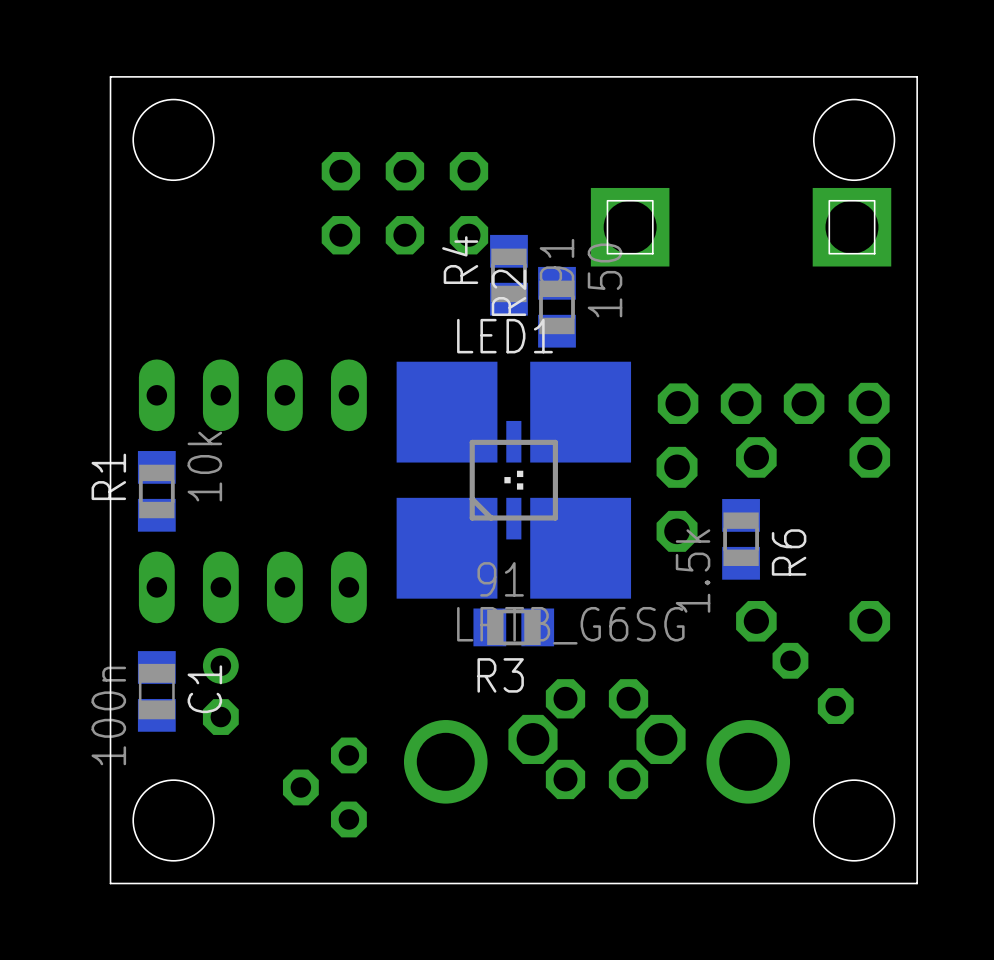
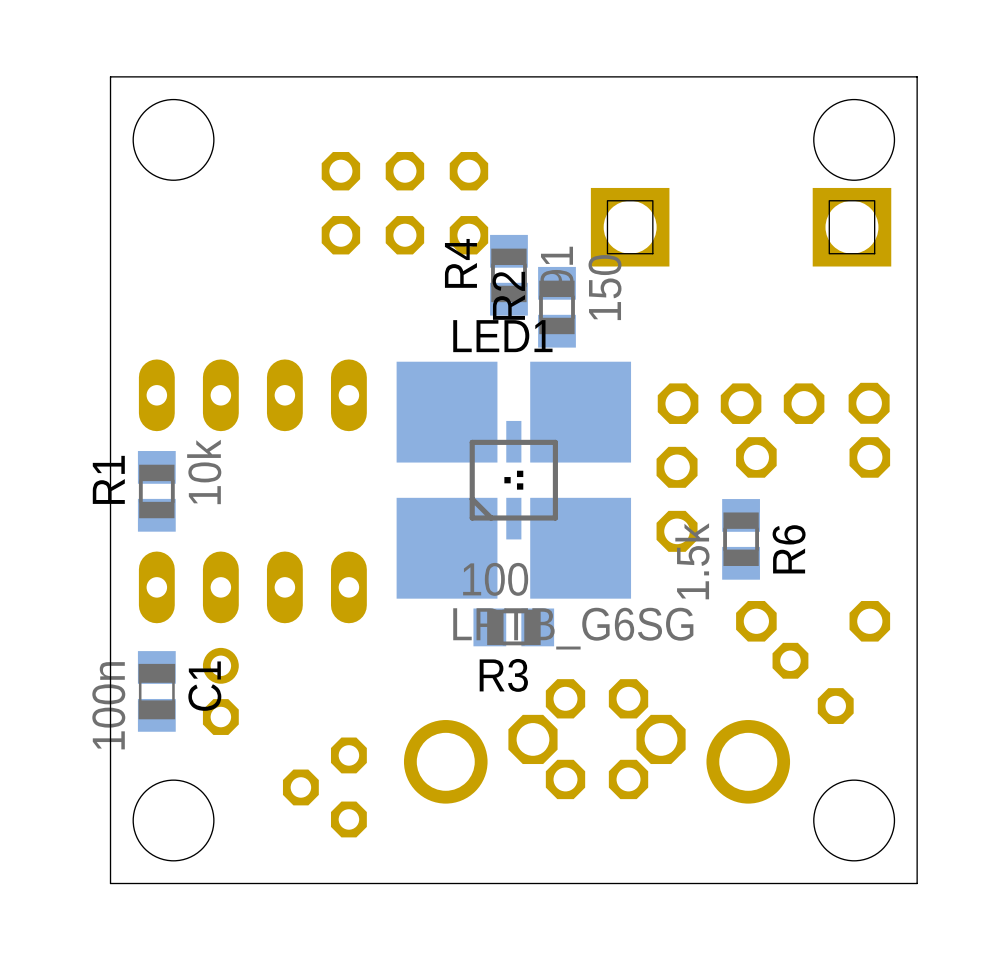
R3 value: 91 (500, 579) -> 100 (495, 579)

